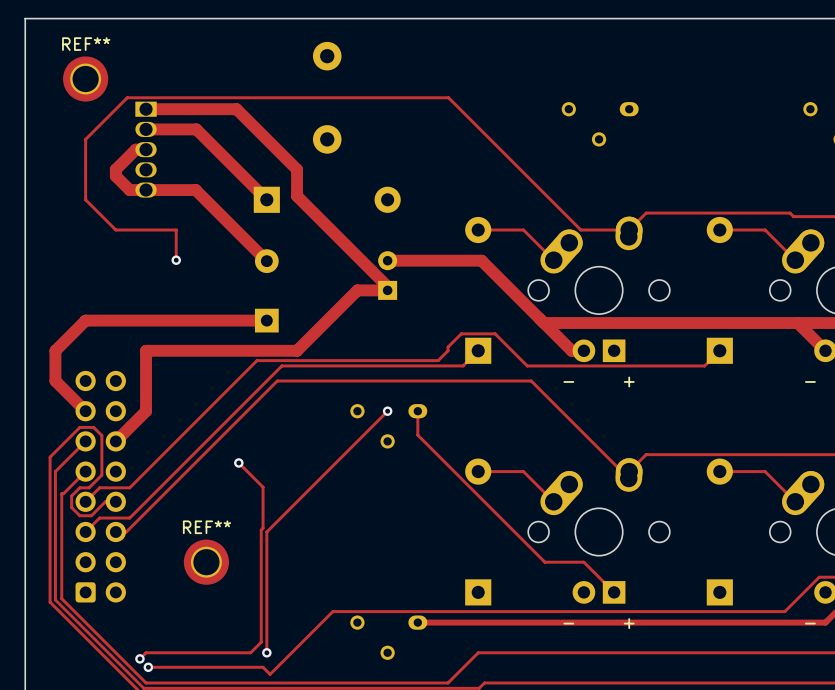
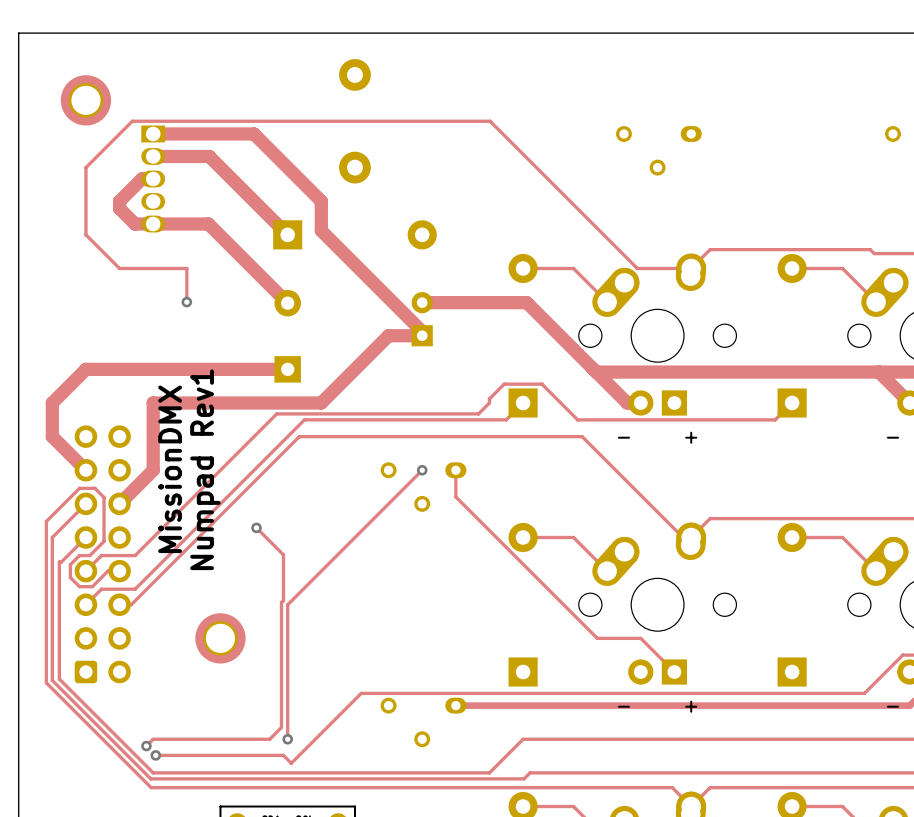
REF** name: REF** (86, 44) -> none
text: none -> MissionDMX (170, 469)
text: none -> Numpad Rev1 (205, 469)
REF** name: REF** (207, 527) -> none

